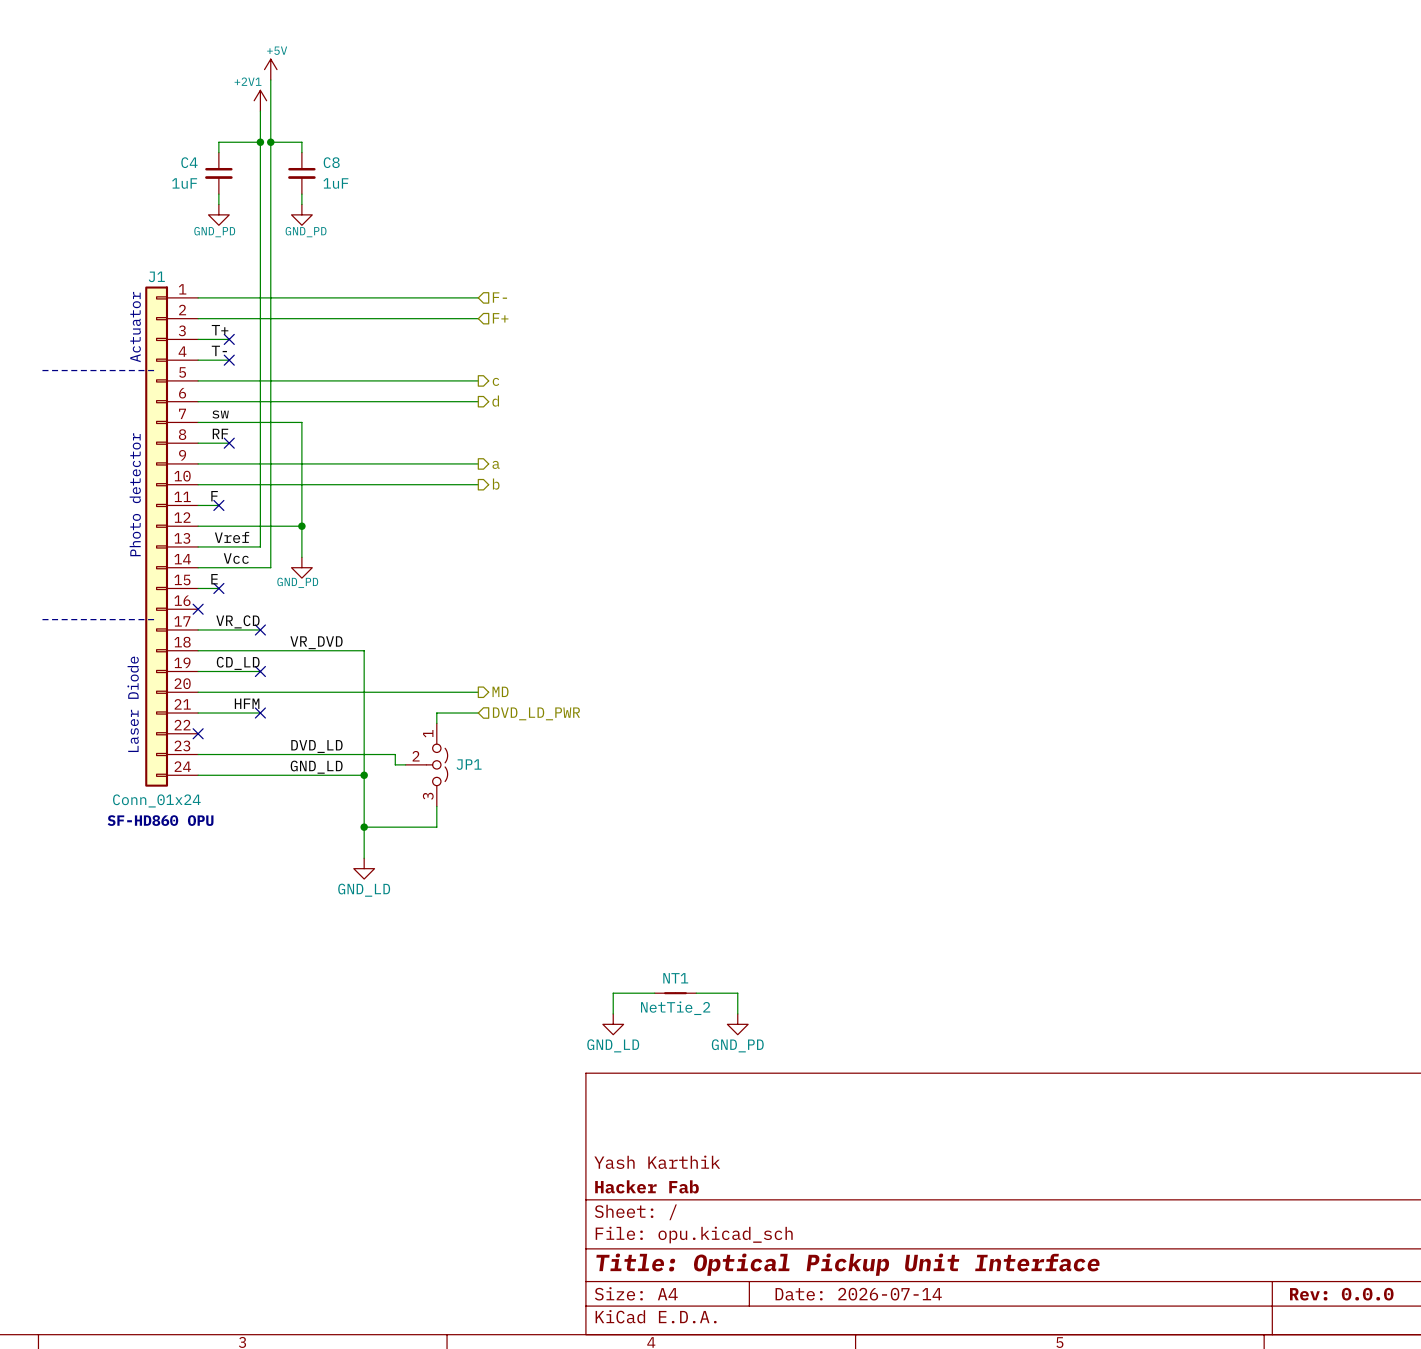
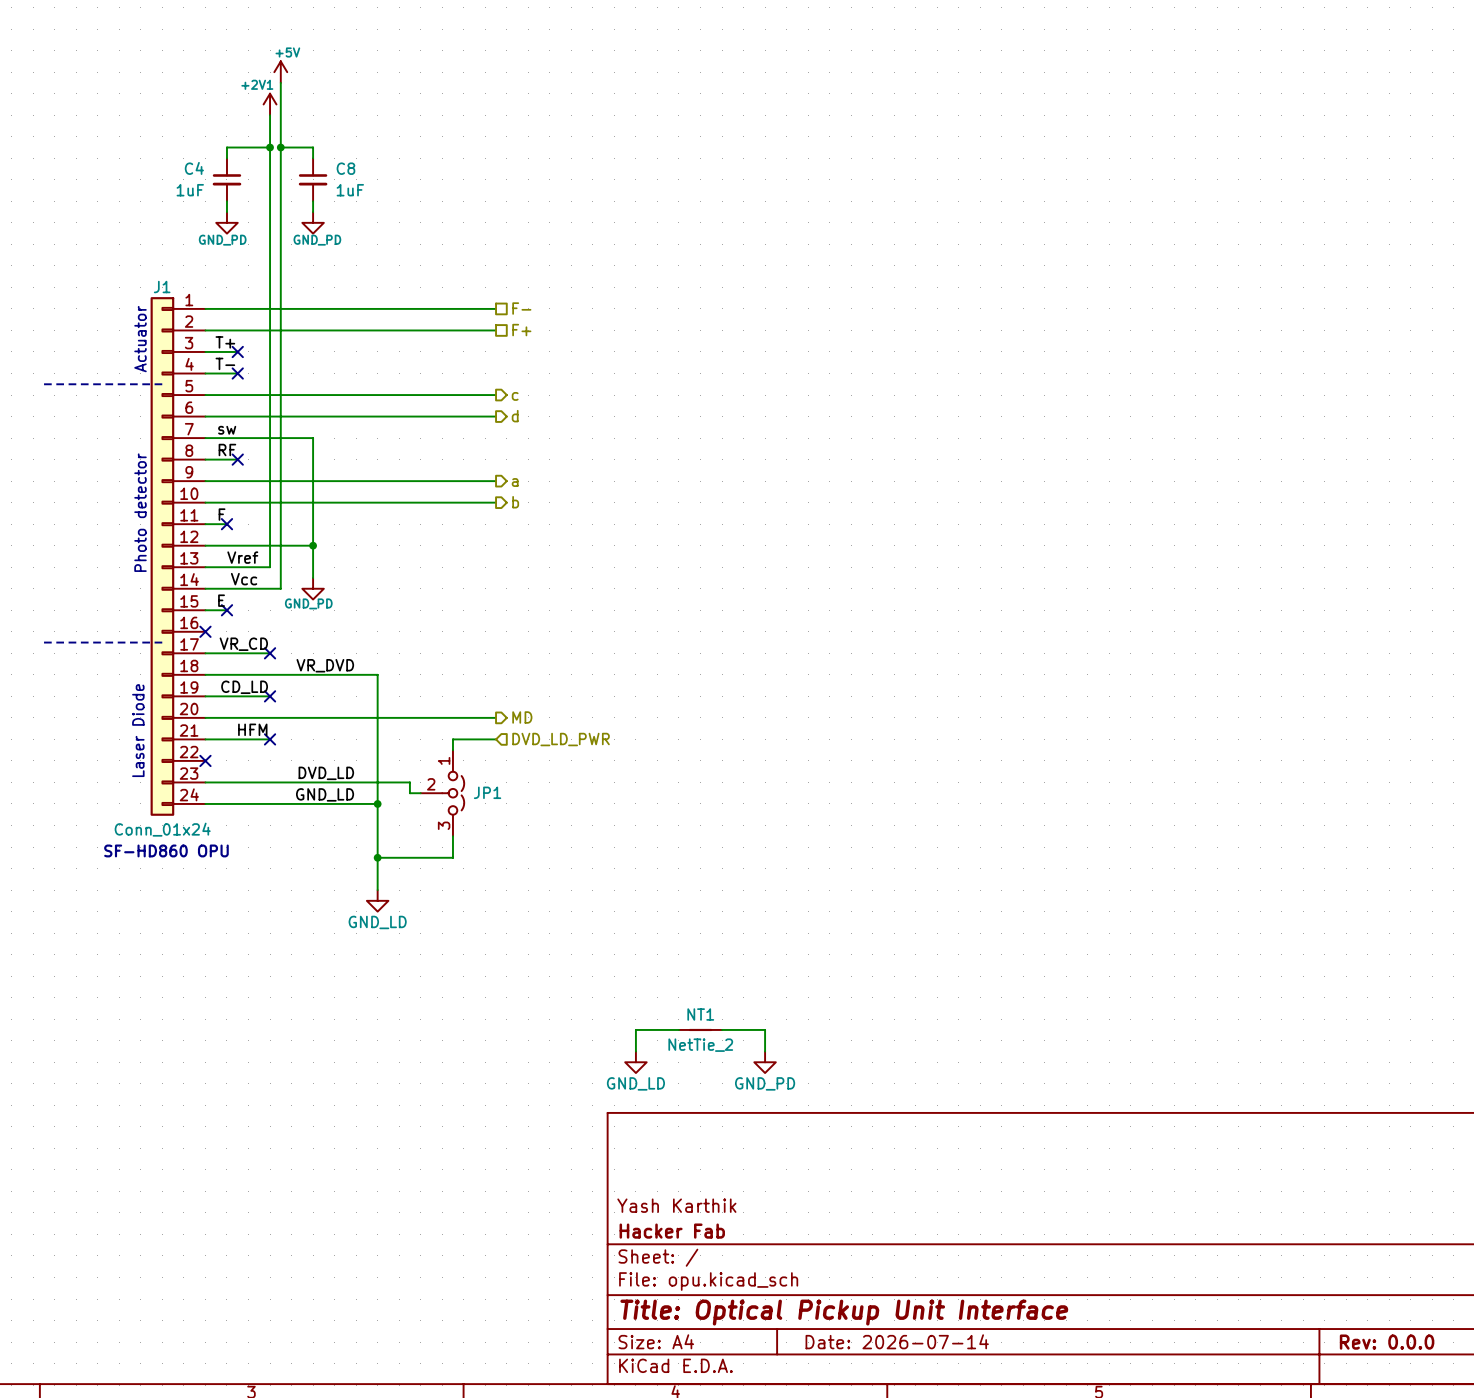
hierarchical label shape: input (499, 297) -> passive (521, 308)
hierarchical label shape: input (500, 318) -> passive (521, 330)

